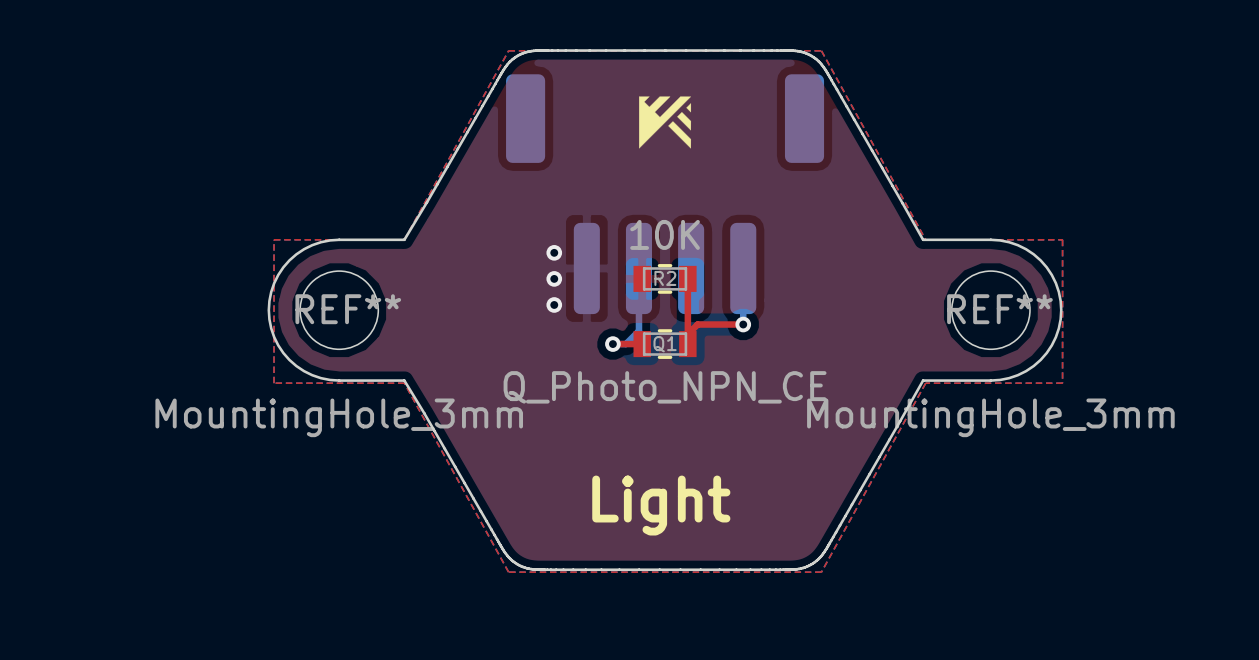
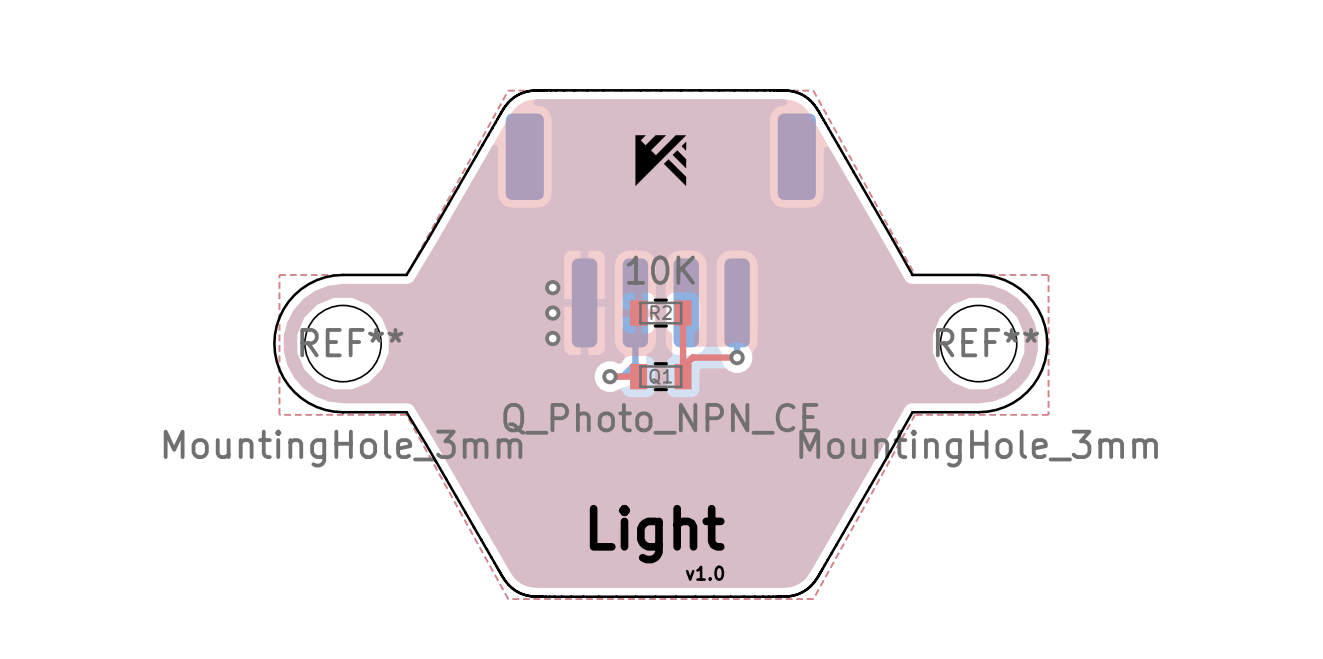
text: none -> v1.0 (705, 573)

